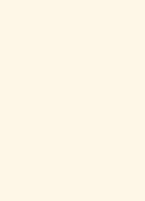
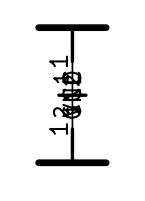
power symbol: none -> (72, 43)
part: none -> (72, 95)
power symbol: none -> (72, 146)

